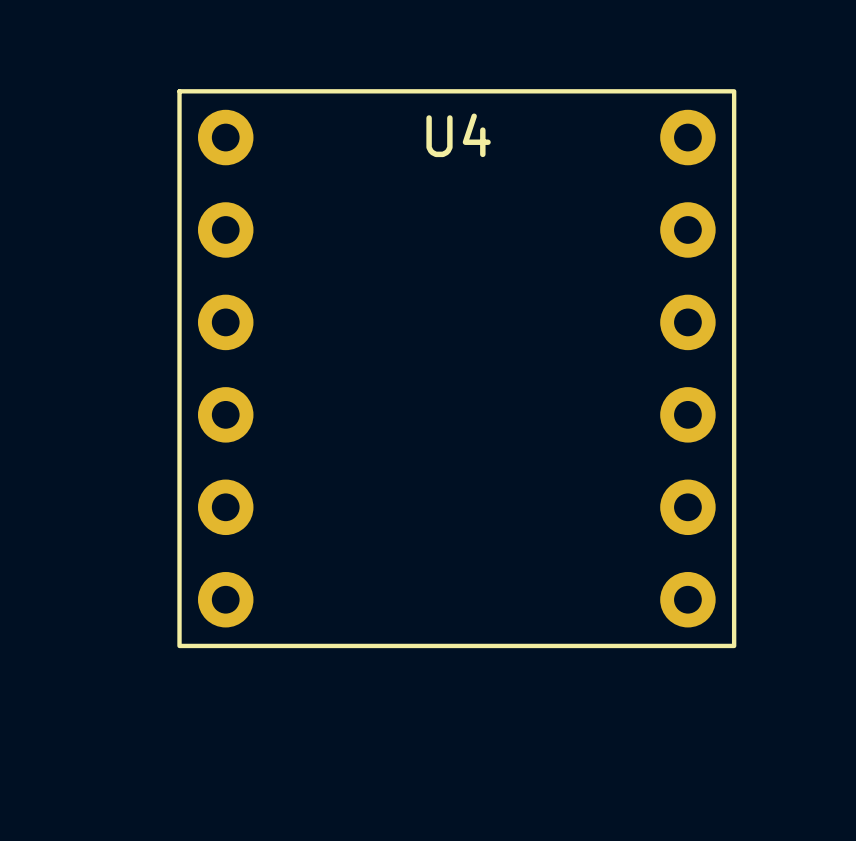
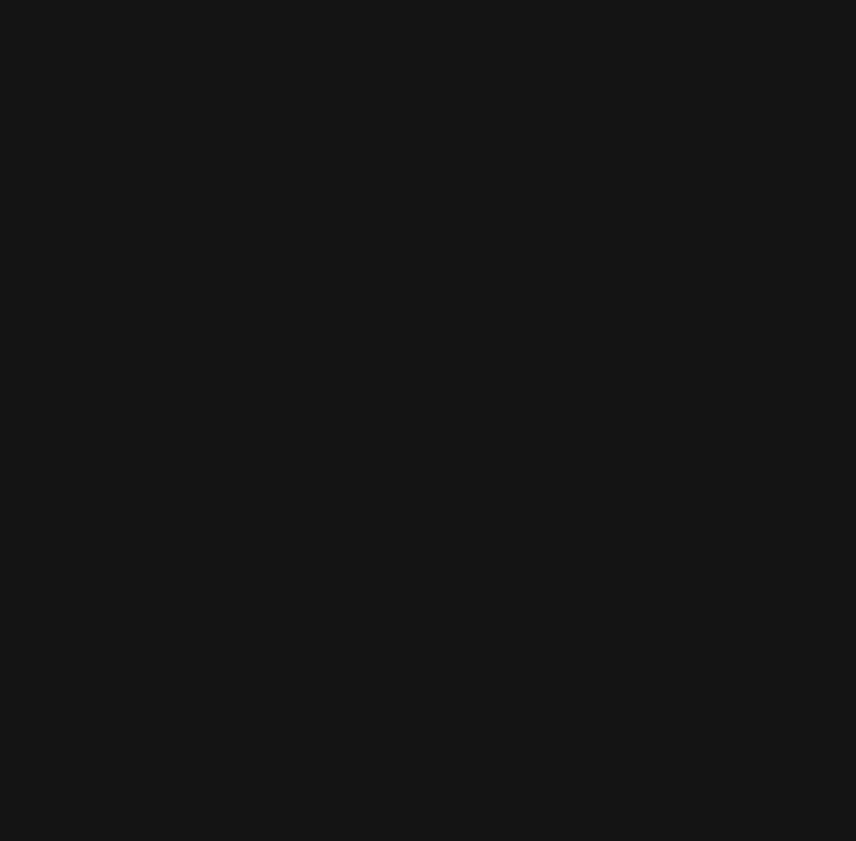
U4: (456, 368) -> none

